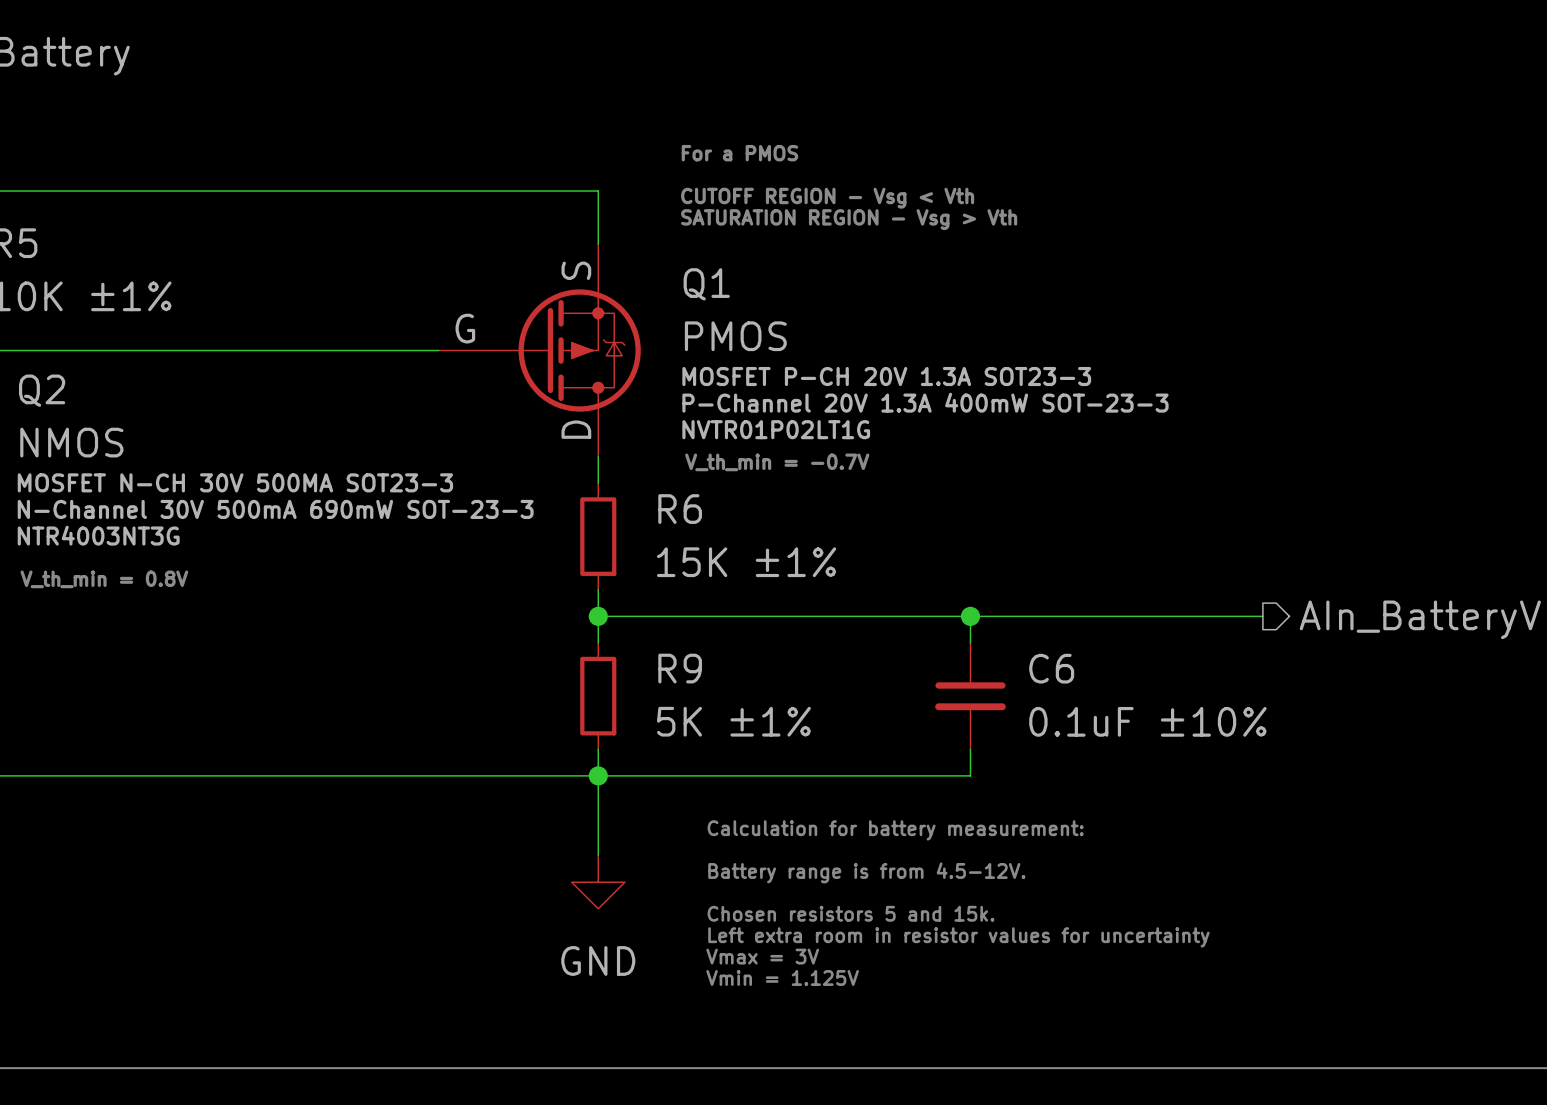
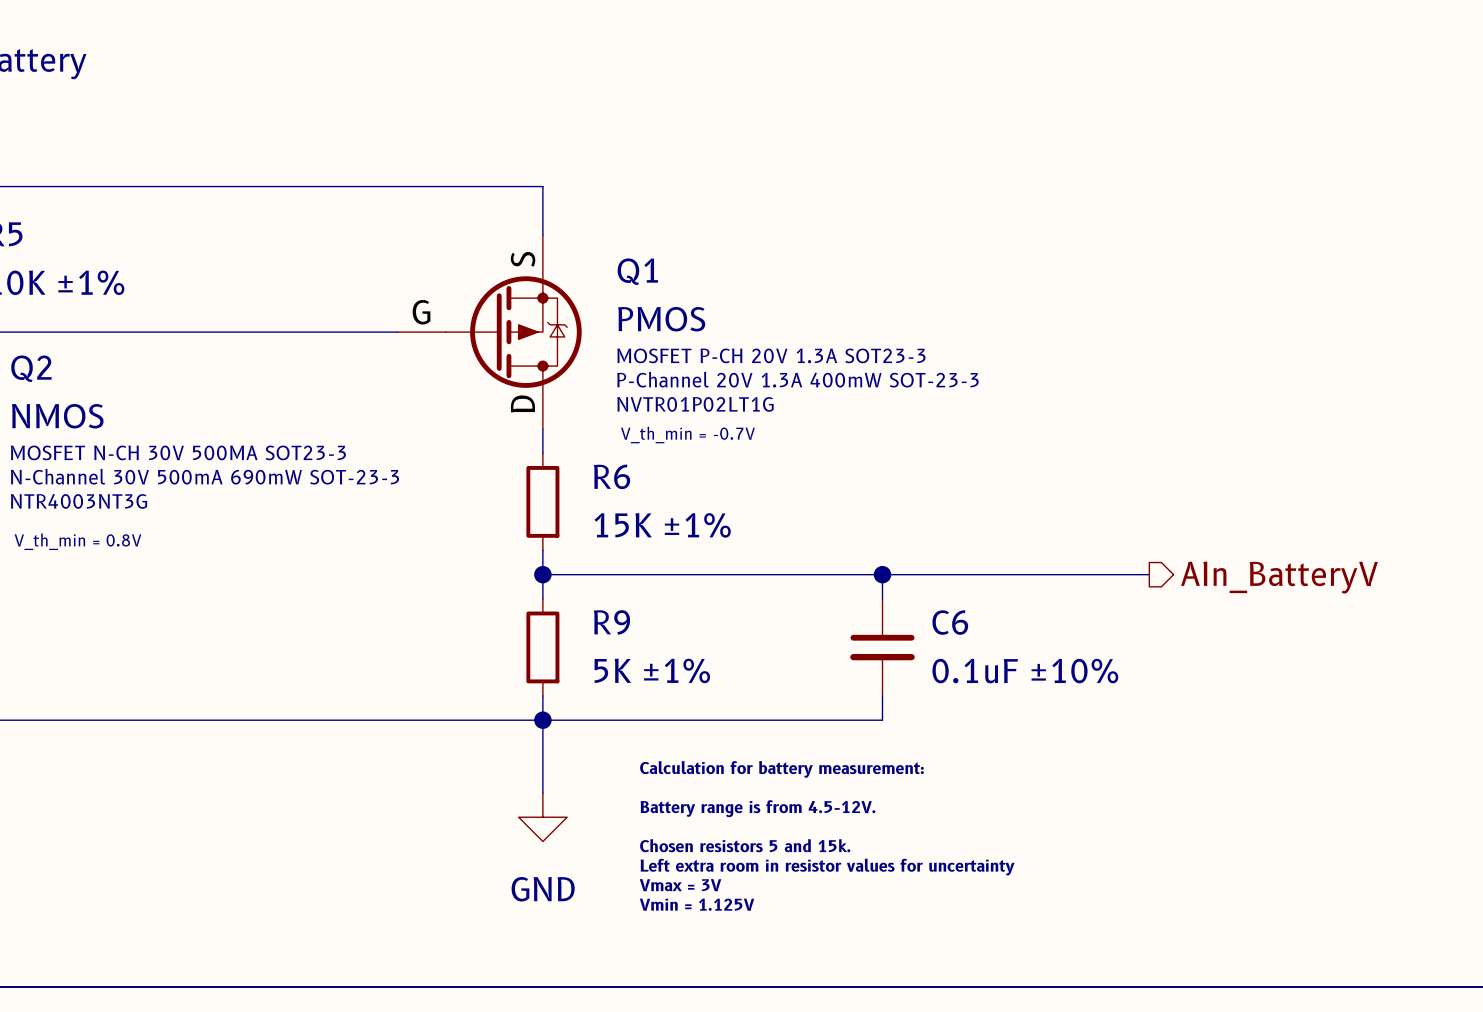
text: For a PMOS (739, 153) -> none
text: CUTOFF REGION - Vsg < Vth (827, 198) -> none
text: SATURATION REGION - Vsg > Vth (849, 219) -> none

